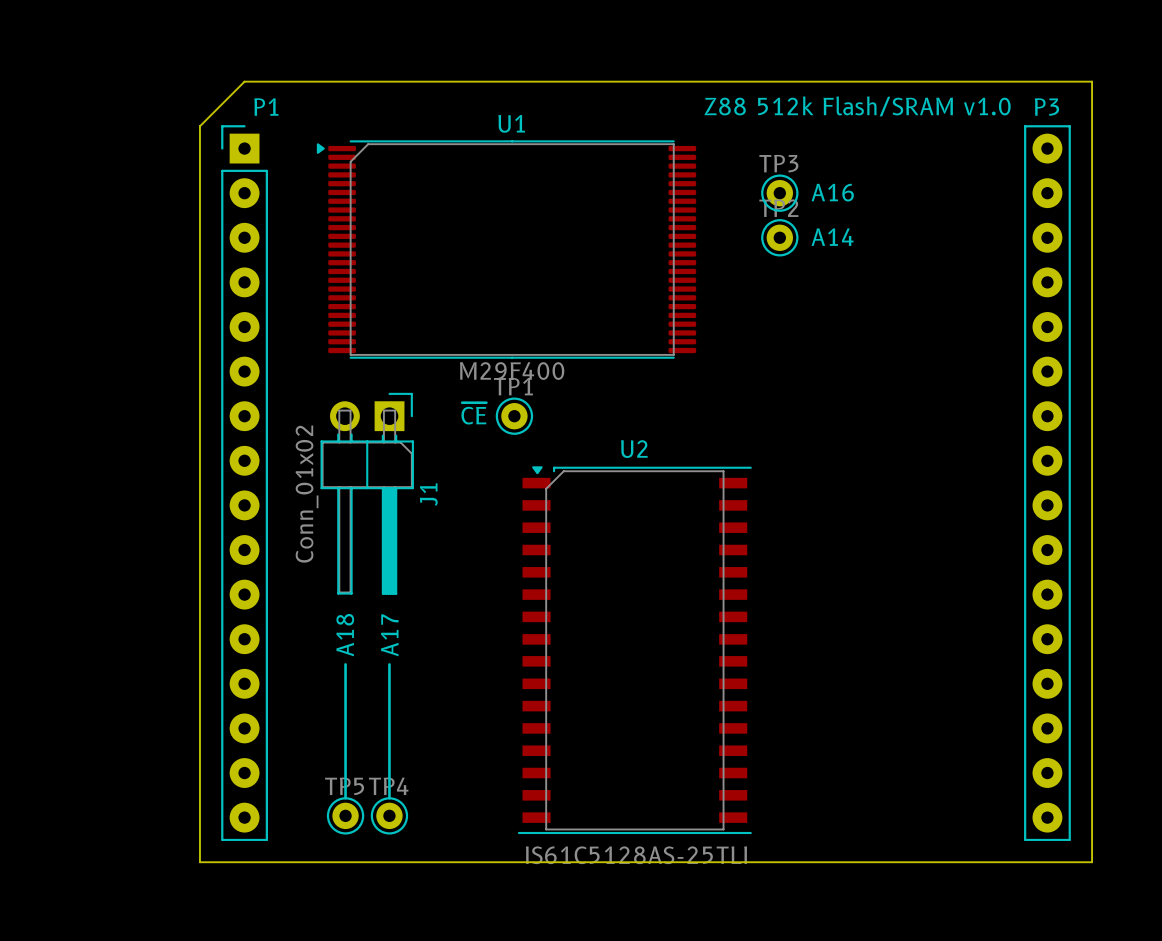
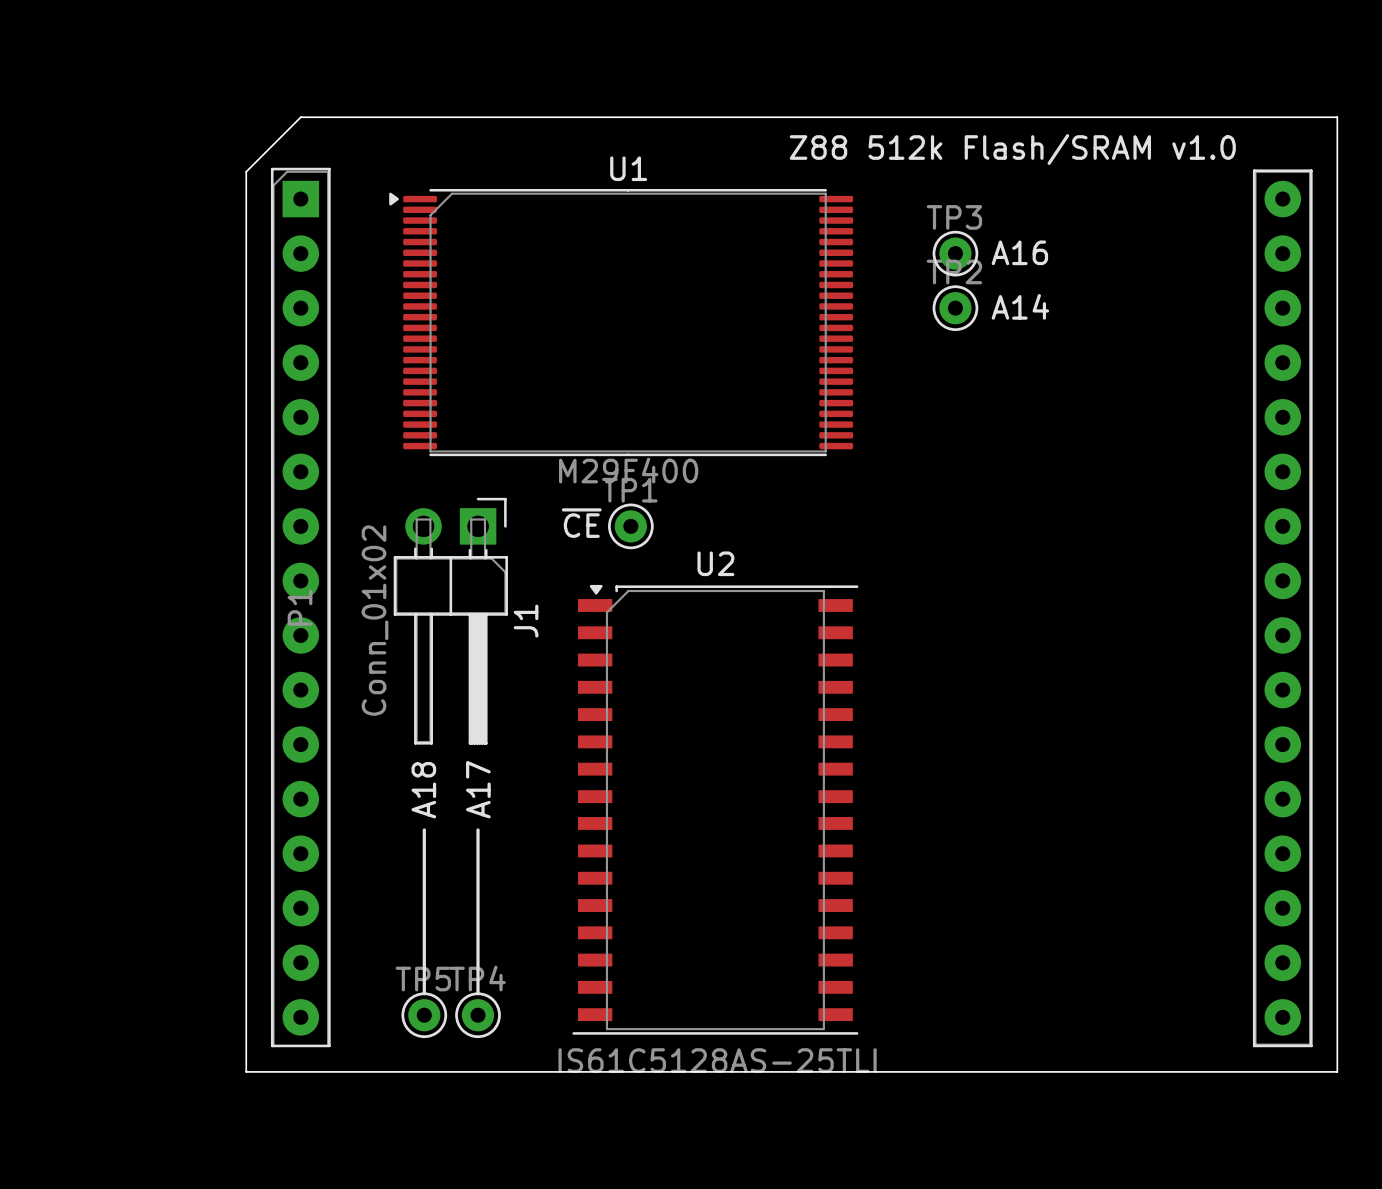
P1 side: bottom (244, 483) -> top (300, 607)
P3 side: bottom (1047, 483) -> top (1282, 608)
U2 position: (634, 650) -> (715, 809)

